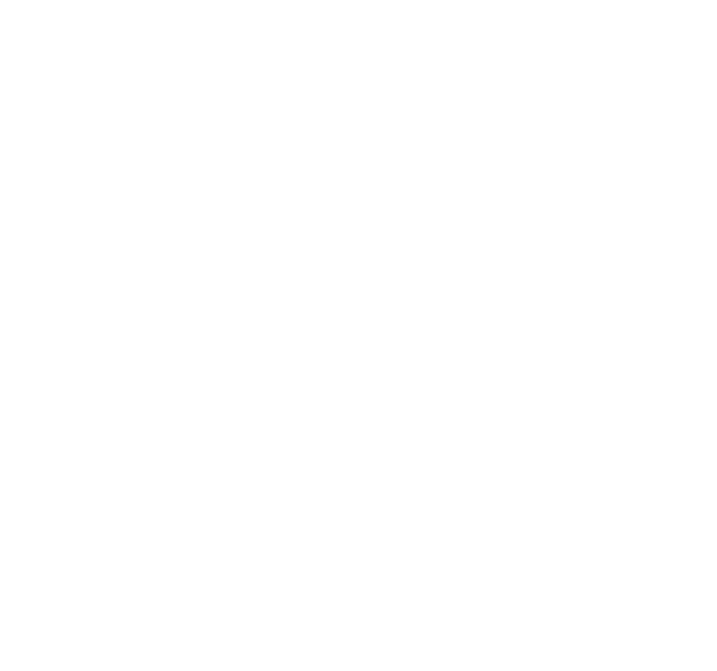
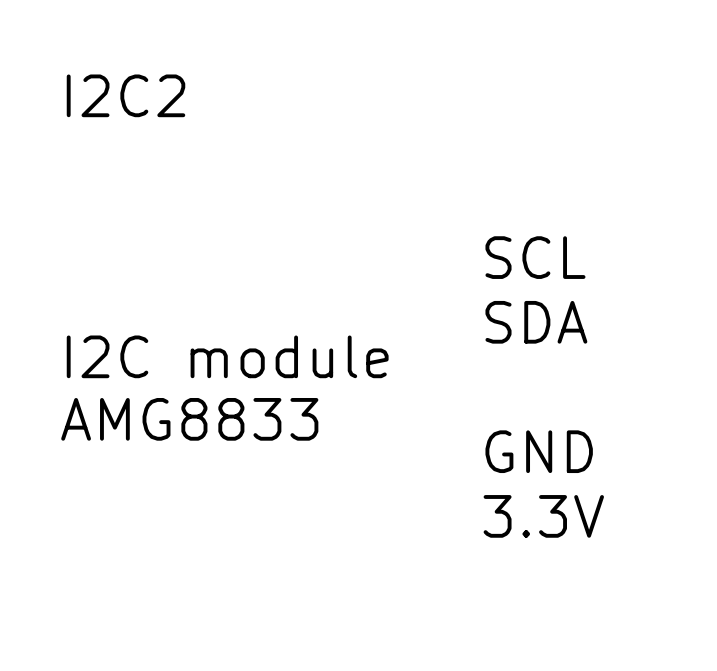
text: none -> I2C2 (126, 95)
text: none -> SCL (535, 257)
text: none -> SDA (536, 322)
text: none -> I2C module (227, 356)
text: none -> AMG8833 (189, 419)
text: none -> GND (539, 451)
text: none -> 3.3V (543, 516)

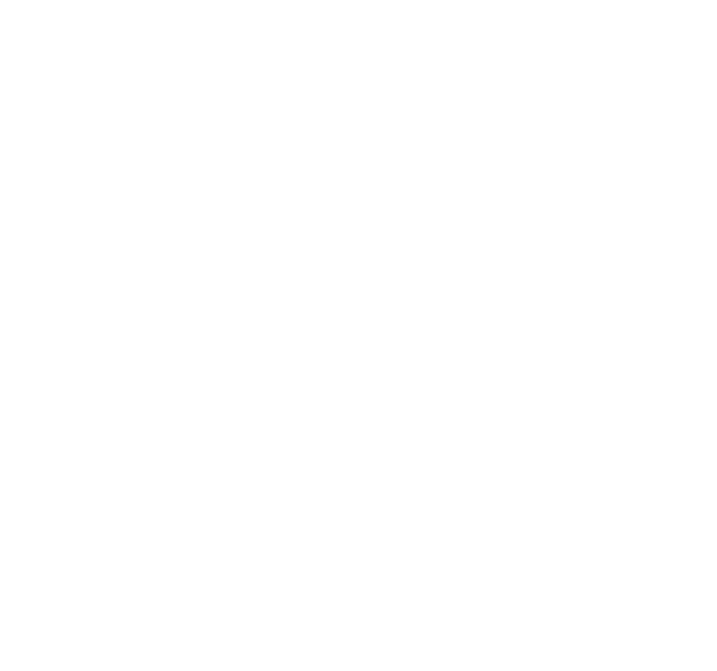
text: I2C2 (126, 95) -> none
text: SCL (535, 257) -> none
text: SDA (536, 322) -> none
text: I2C module (227, 356) -> none
text: AMG8833 (189, 419) -> none
text: GND (539, 451) -> none
text: 3.3V (543, 516) -> none

